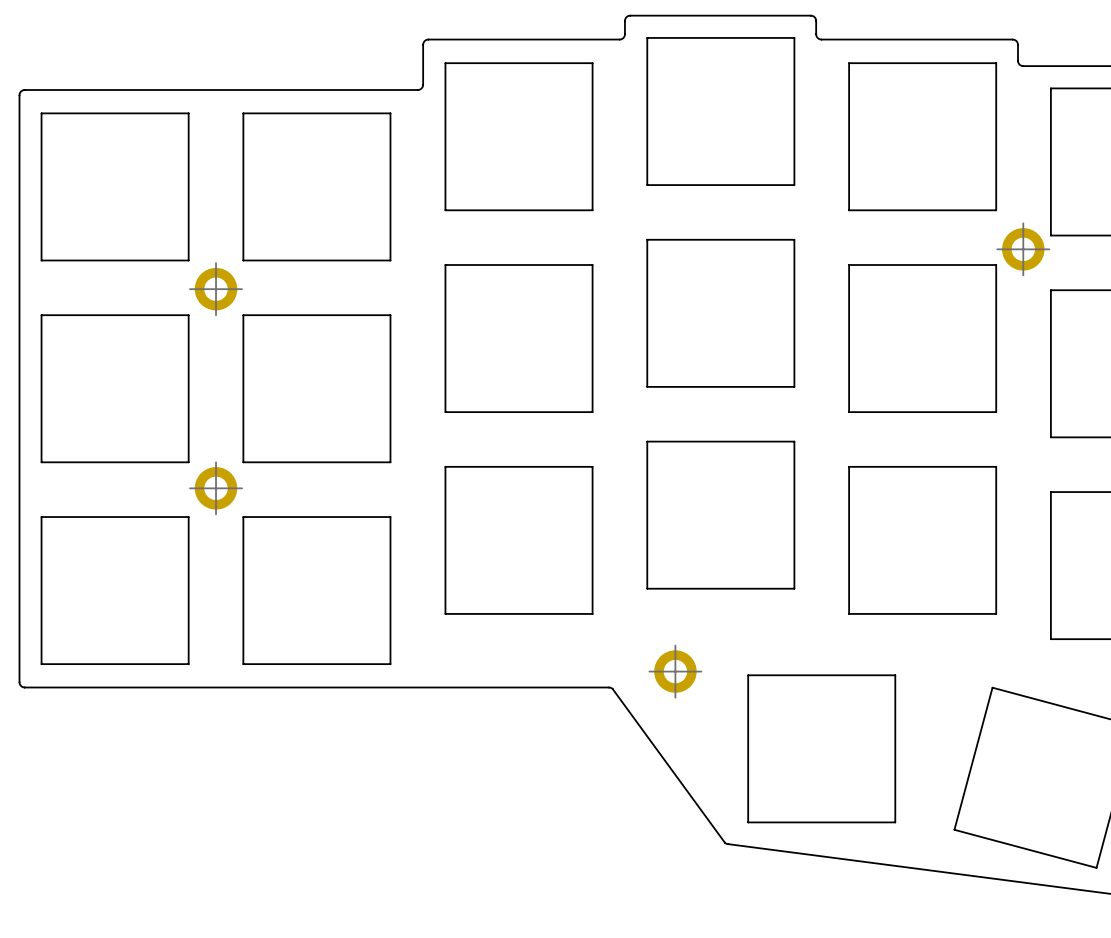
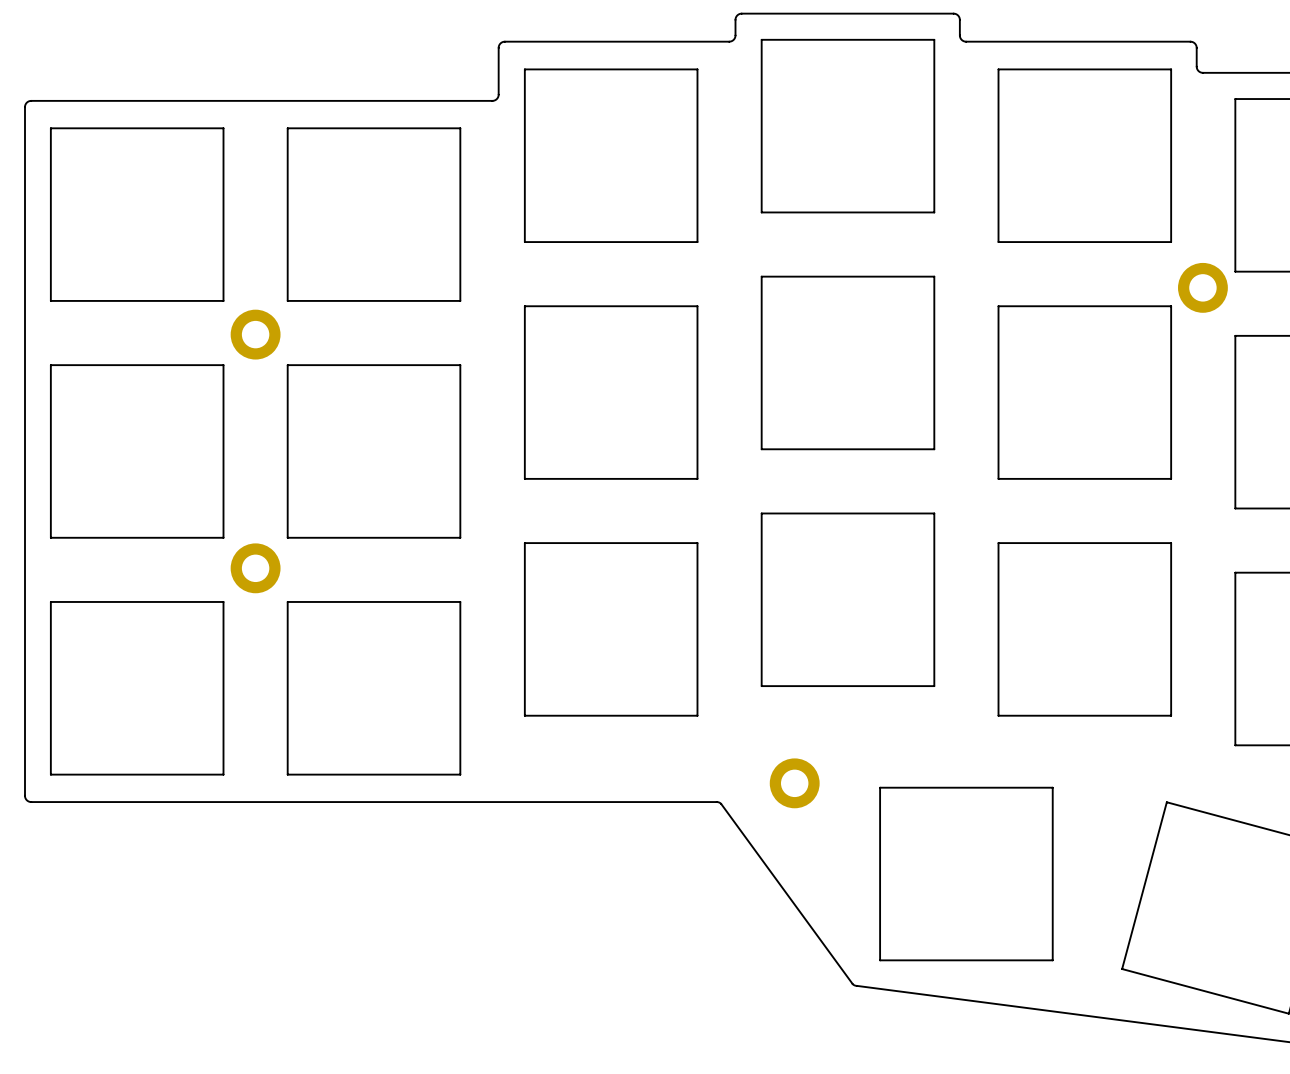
line: (1023, 223) (1023, 275) -> none
line: (997, 249) (1049, 249) -> none
line: (216, 263) (216, 315) -> none
line: (189, 289) (242, 289) -> none
line: (216, 462) (216, 514) -> none
line: (189, 488) (242, 488) -> none
line: (675, 645) (675, 697) -> none
line: (649, 671) (701, 671) -> none

